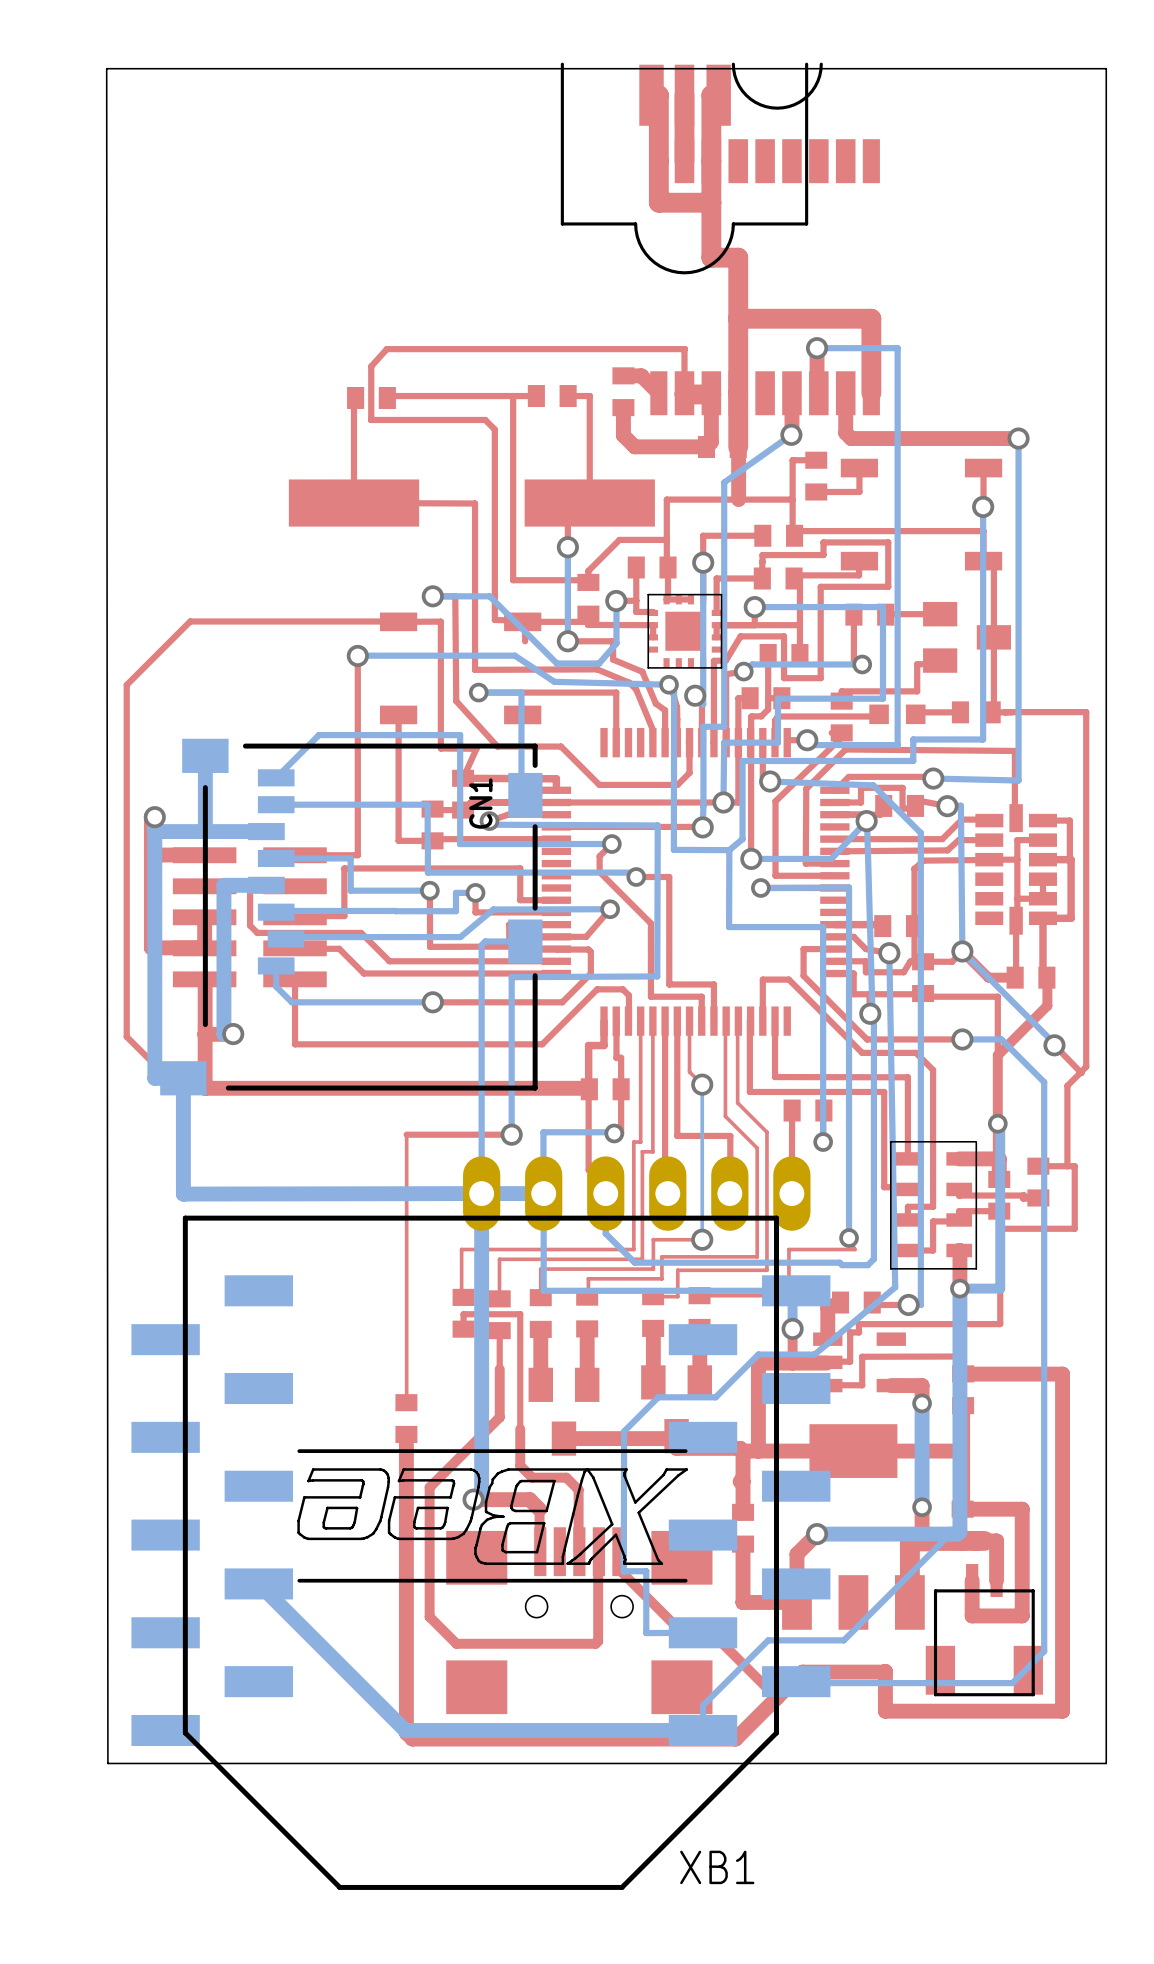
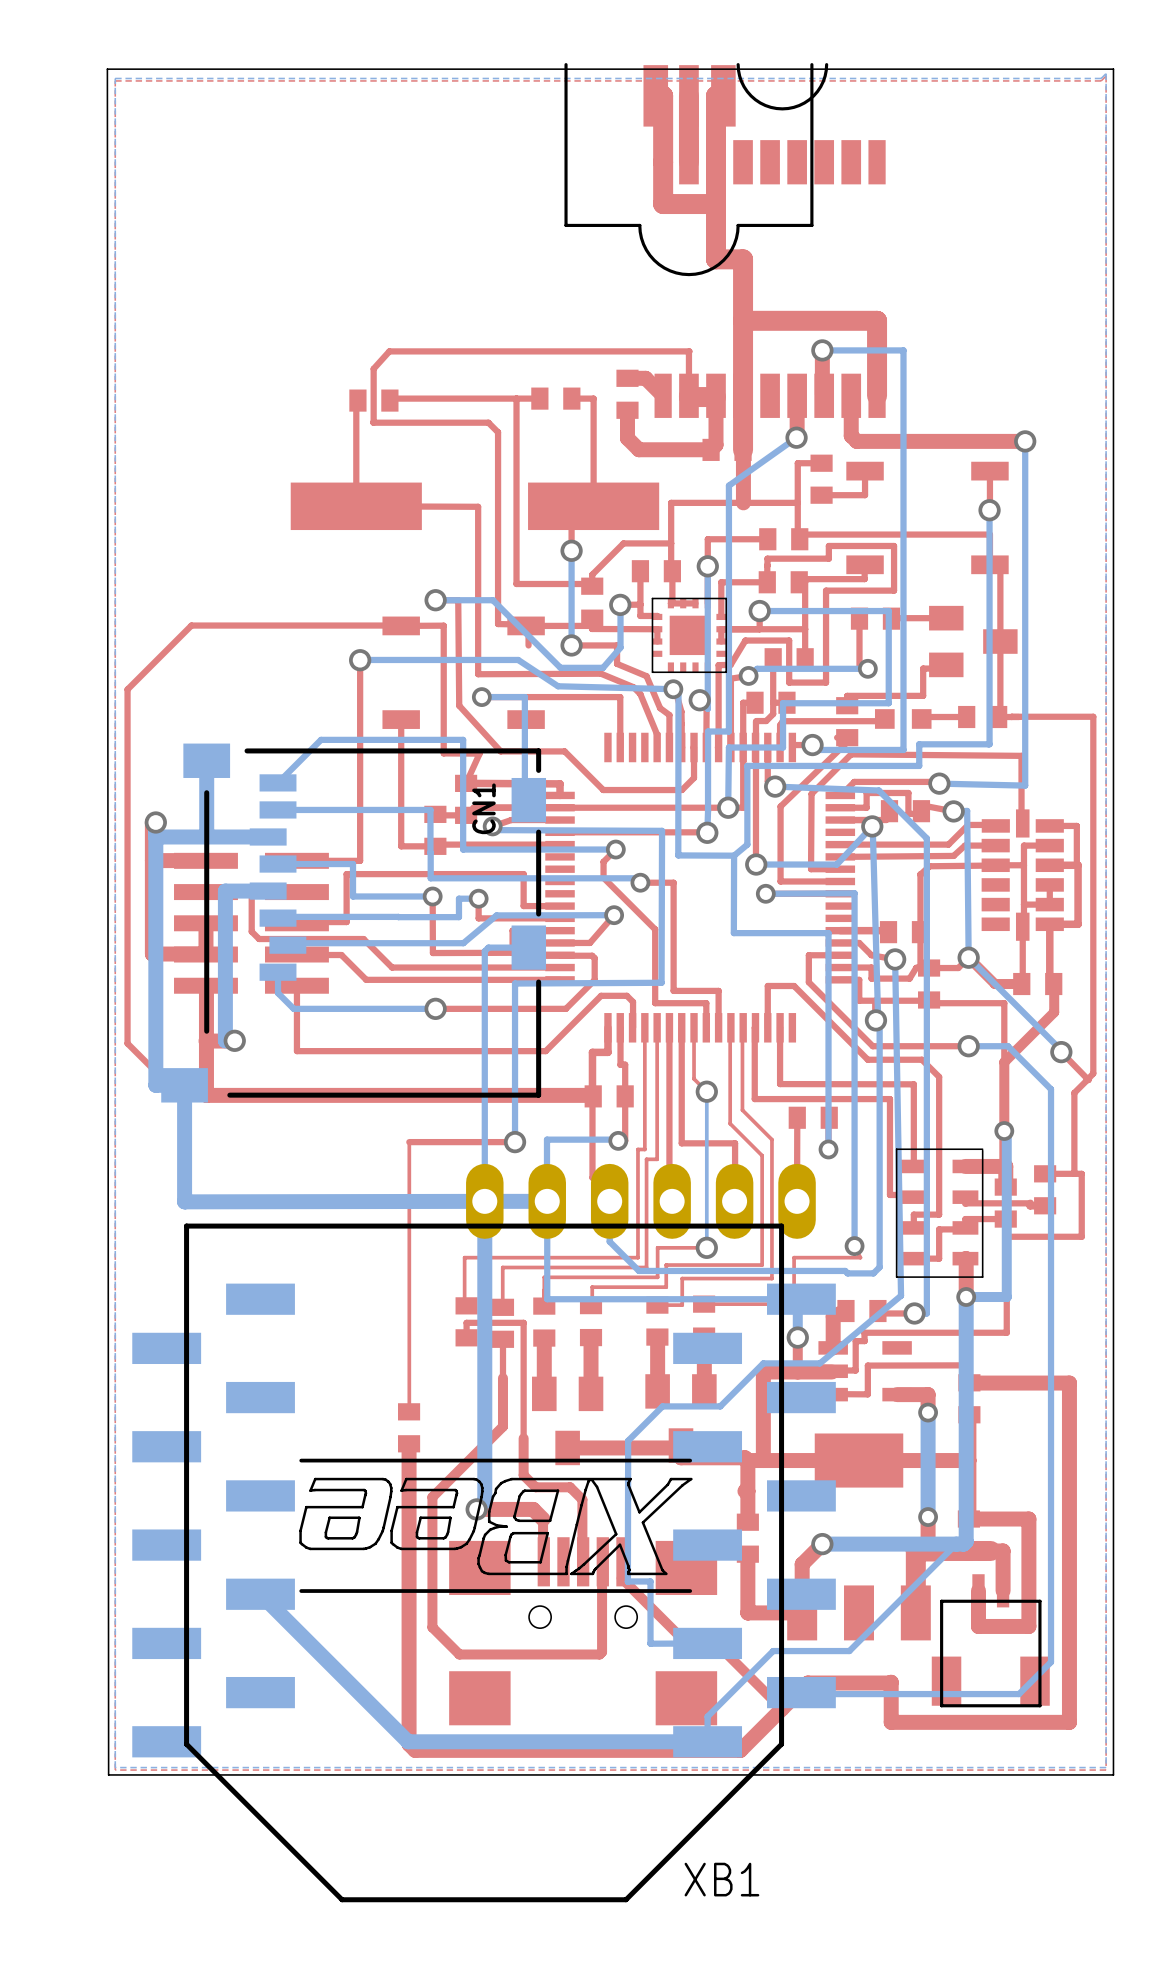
bottom zone outline: none -> (1106, 73) (1106, 1767) (115, 1767) (115, 78) (1101, 78) (1106, 73)
top zone outline: none -> (1106, 76) (1106, 1770) (115, 1770) (115, 80) (1101, 80) (1106, 76)

